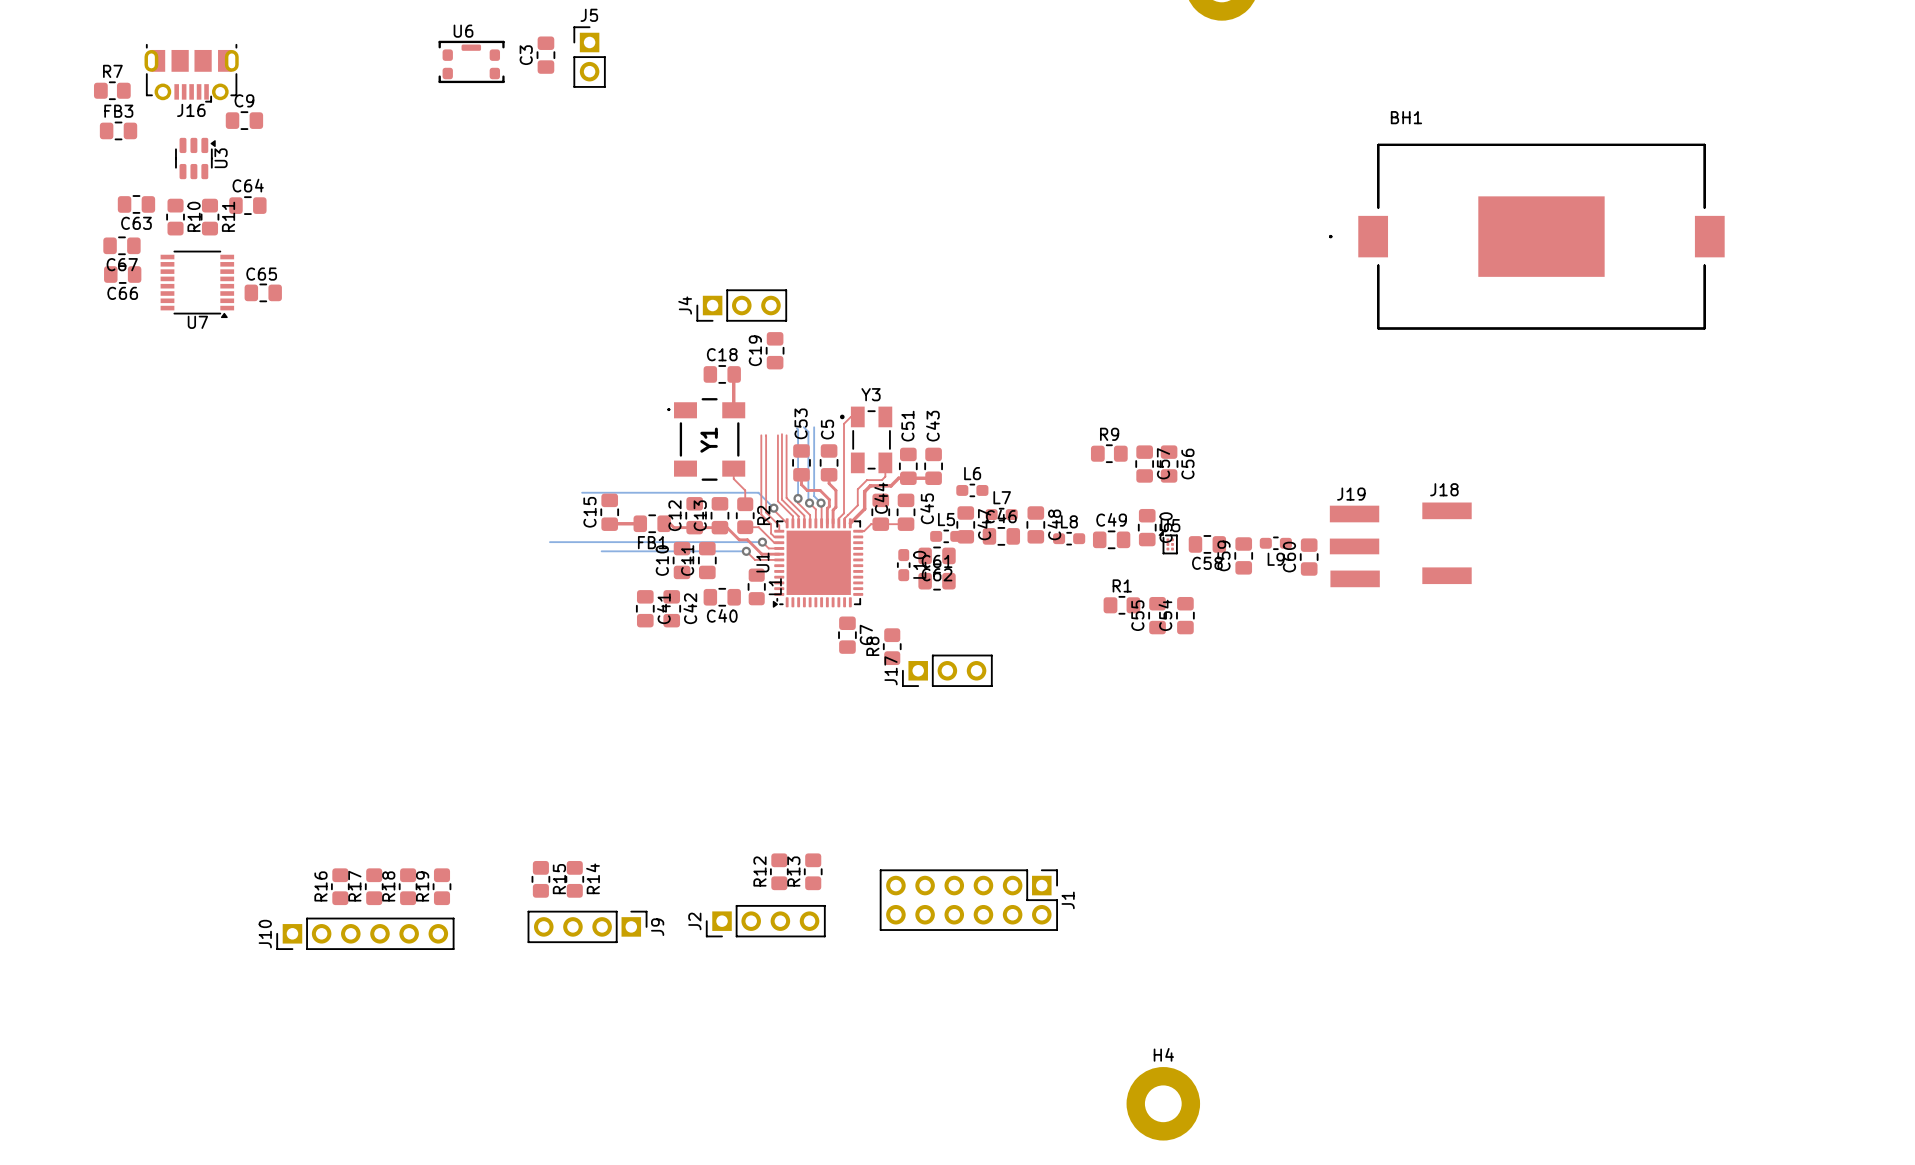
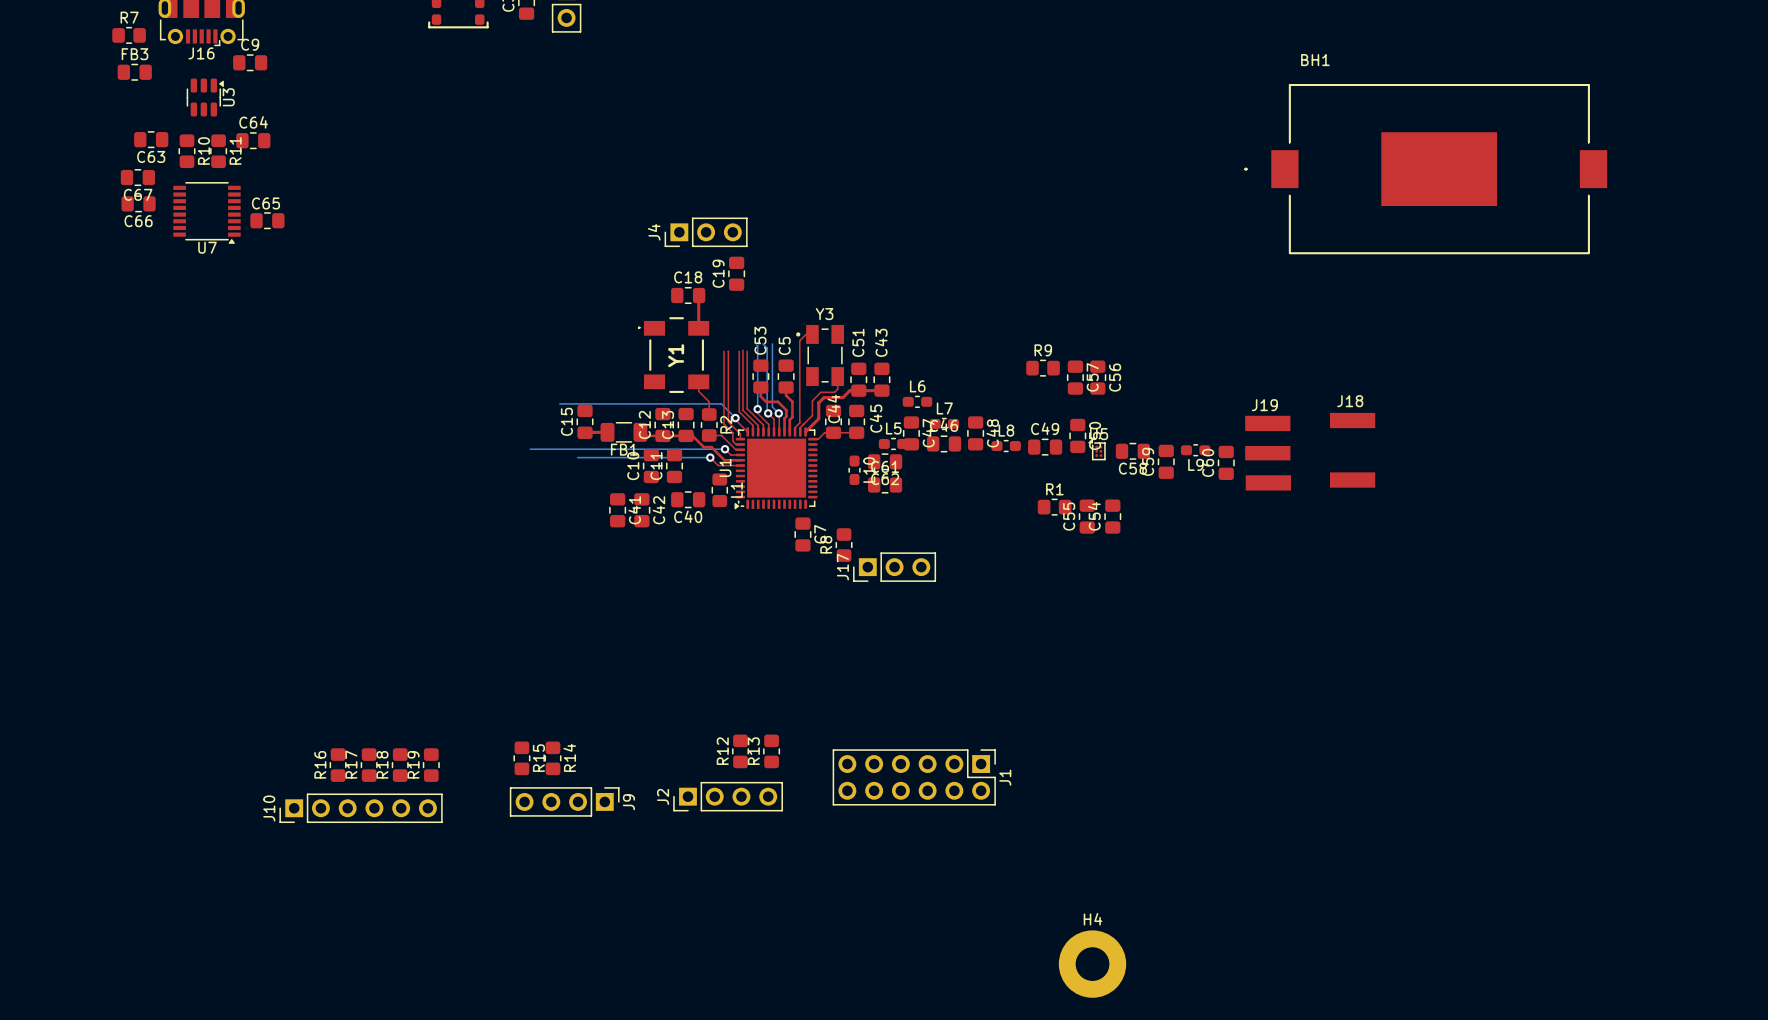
FB1 footprint: [633, 514, 671, 533] -> [600, 422, 648, 443]

